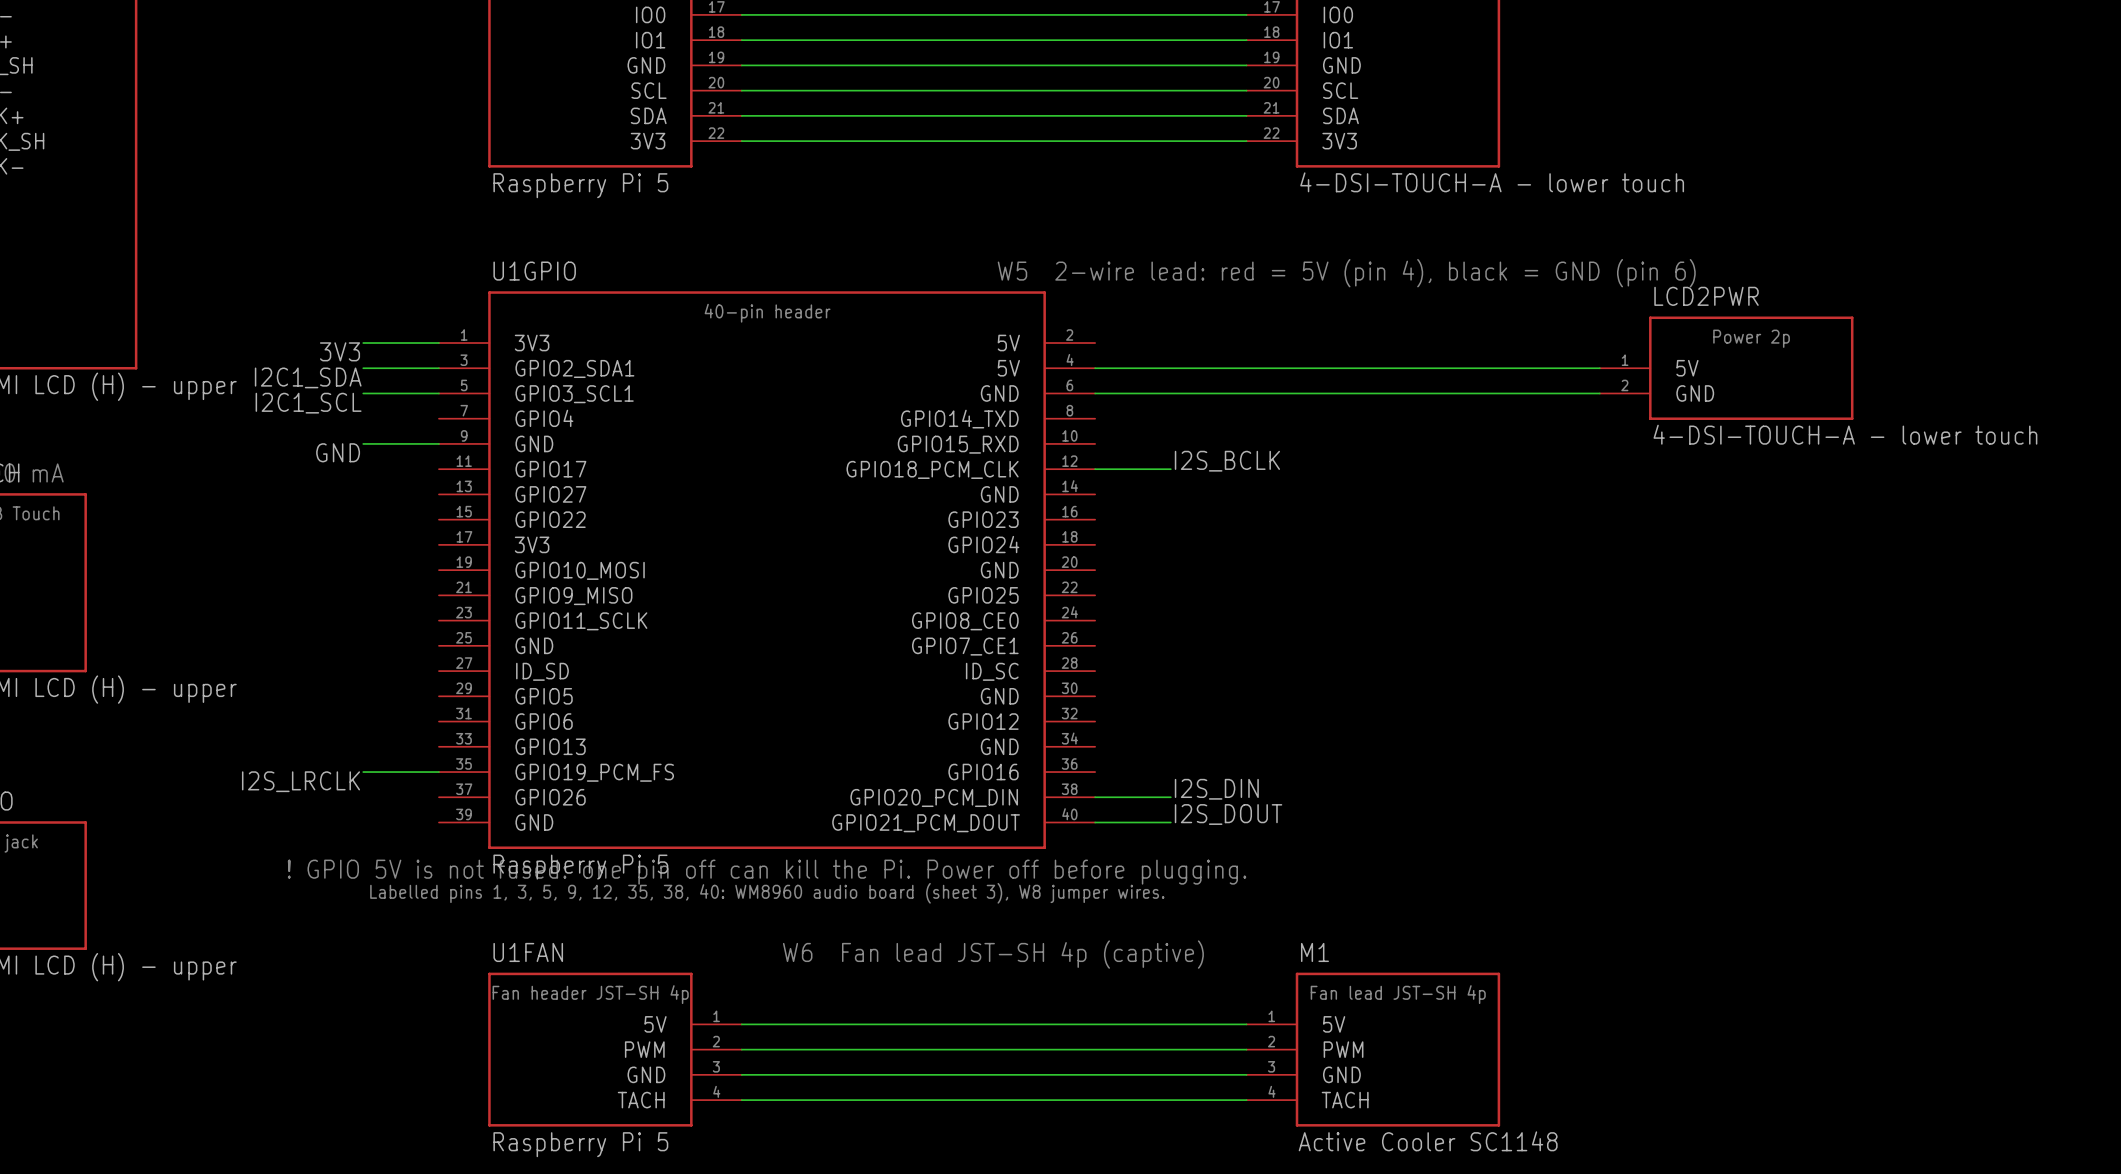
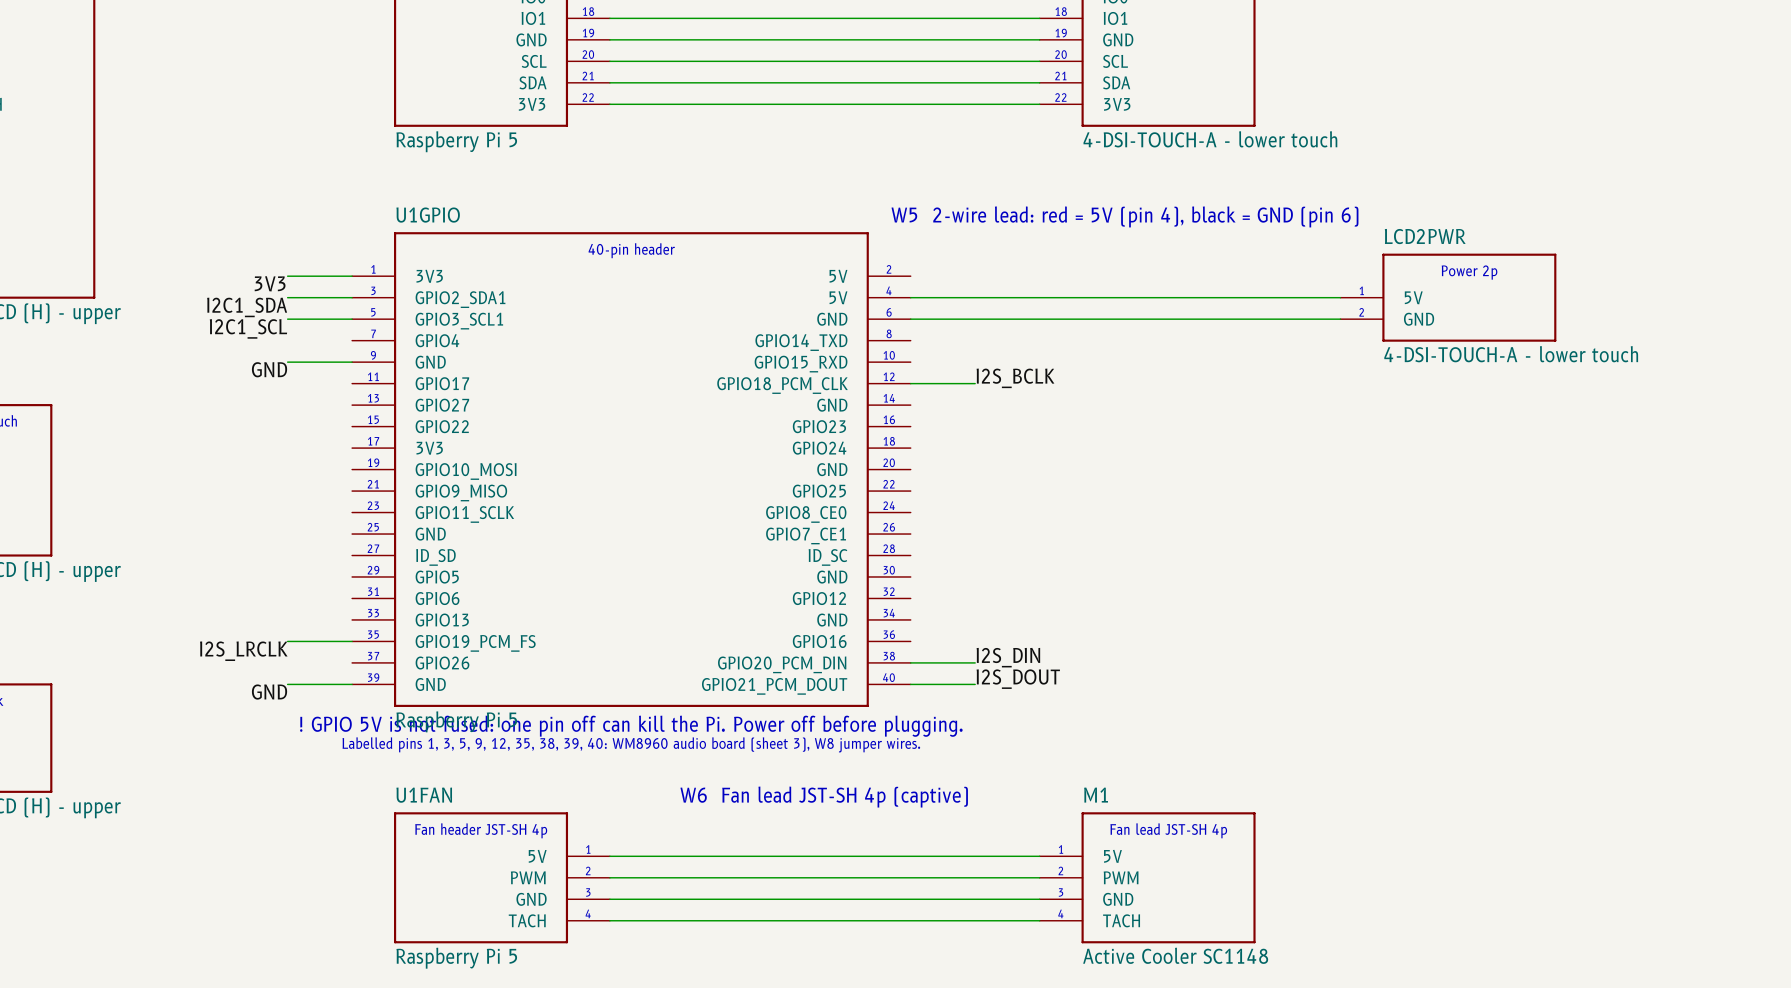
wire: none -> (287, 684) (352, 684)
label: none -> GND (269, 692)
text: Labelled pins 1, 3, 5, 9, 12, 35, 38, 40: WM8960 audio board (sheet 3), W8 jumper wires. (767, 893) -> Labelled pins 1, 3, 5, 9, 12, 35, 38, 39, 40: WM8960 audio board (sheet 3), W8 jumper wires. (631, 744)

